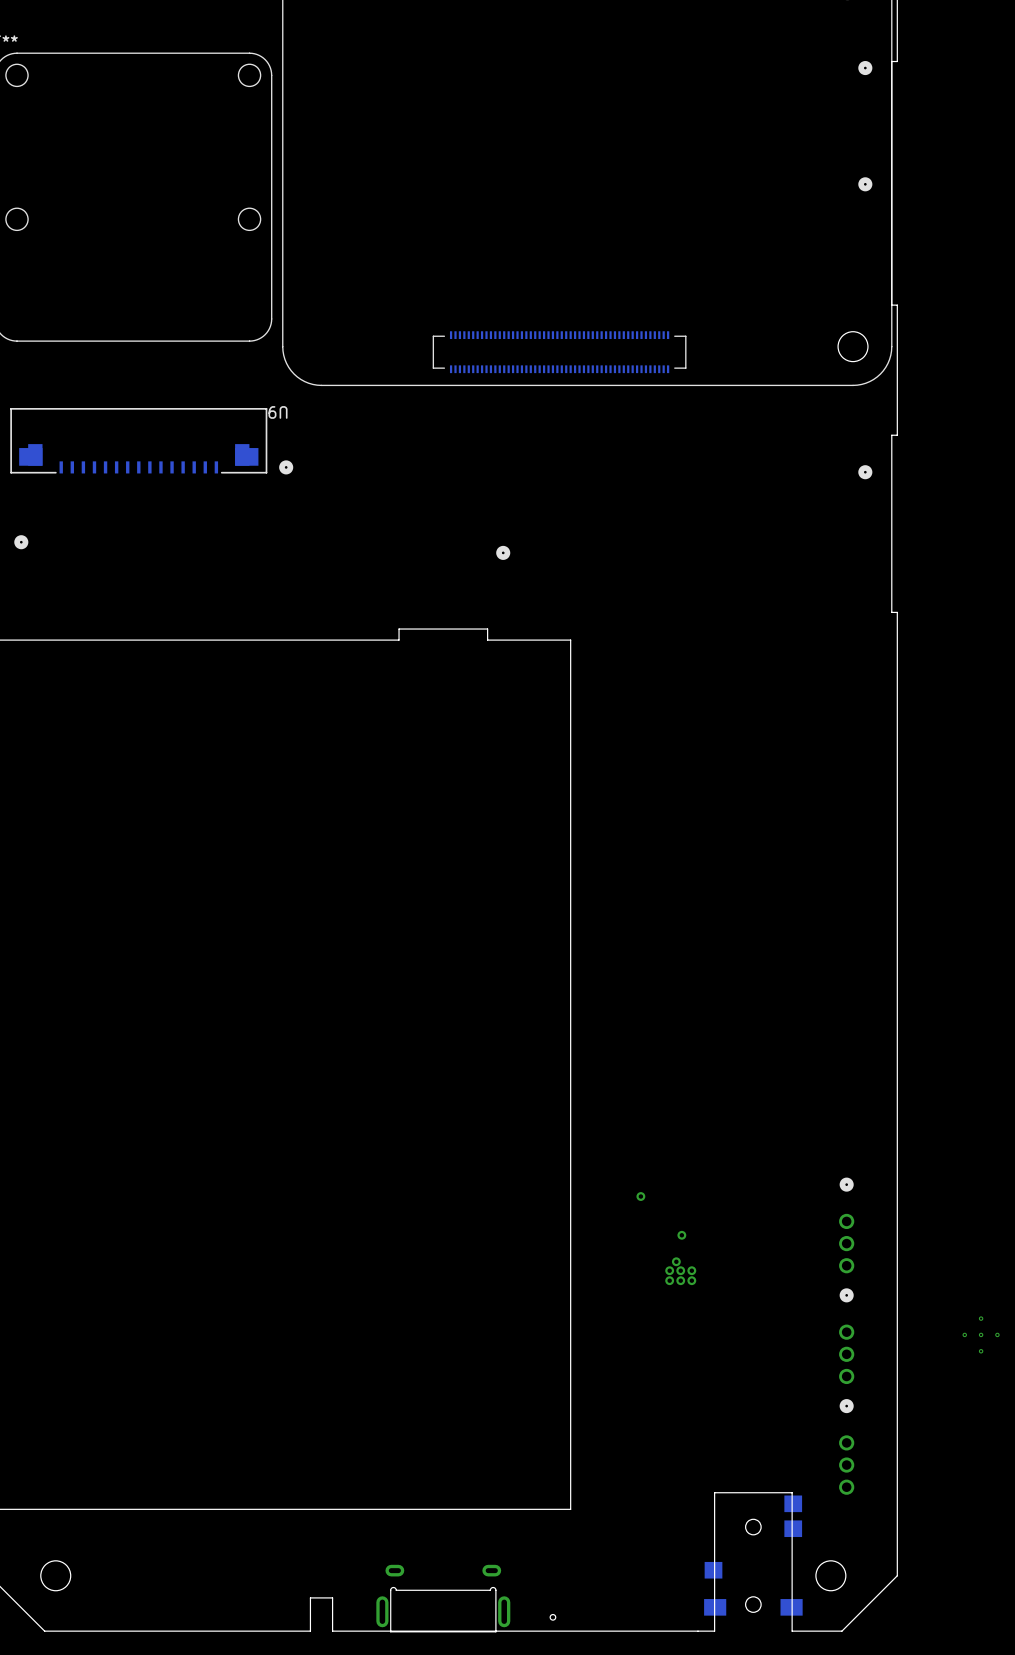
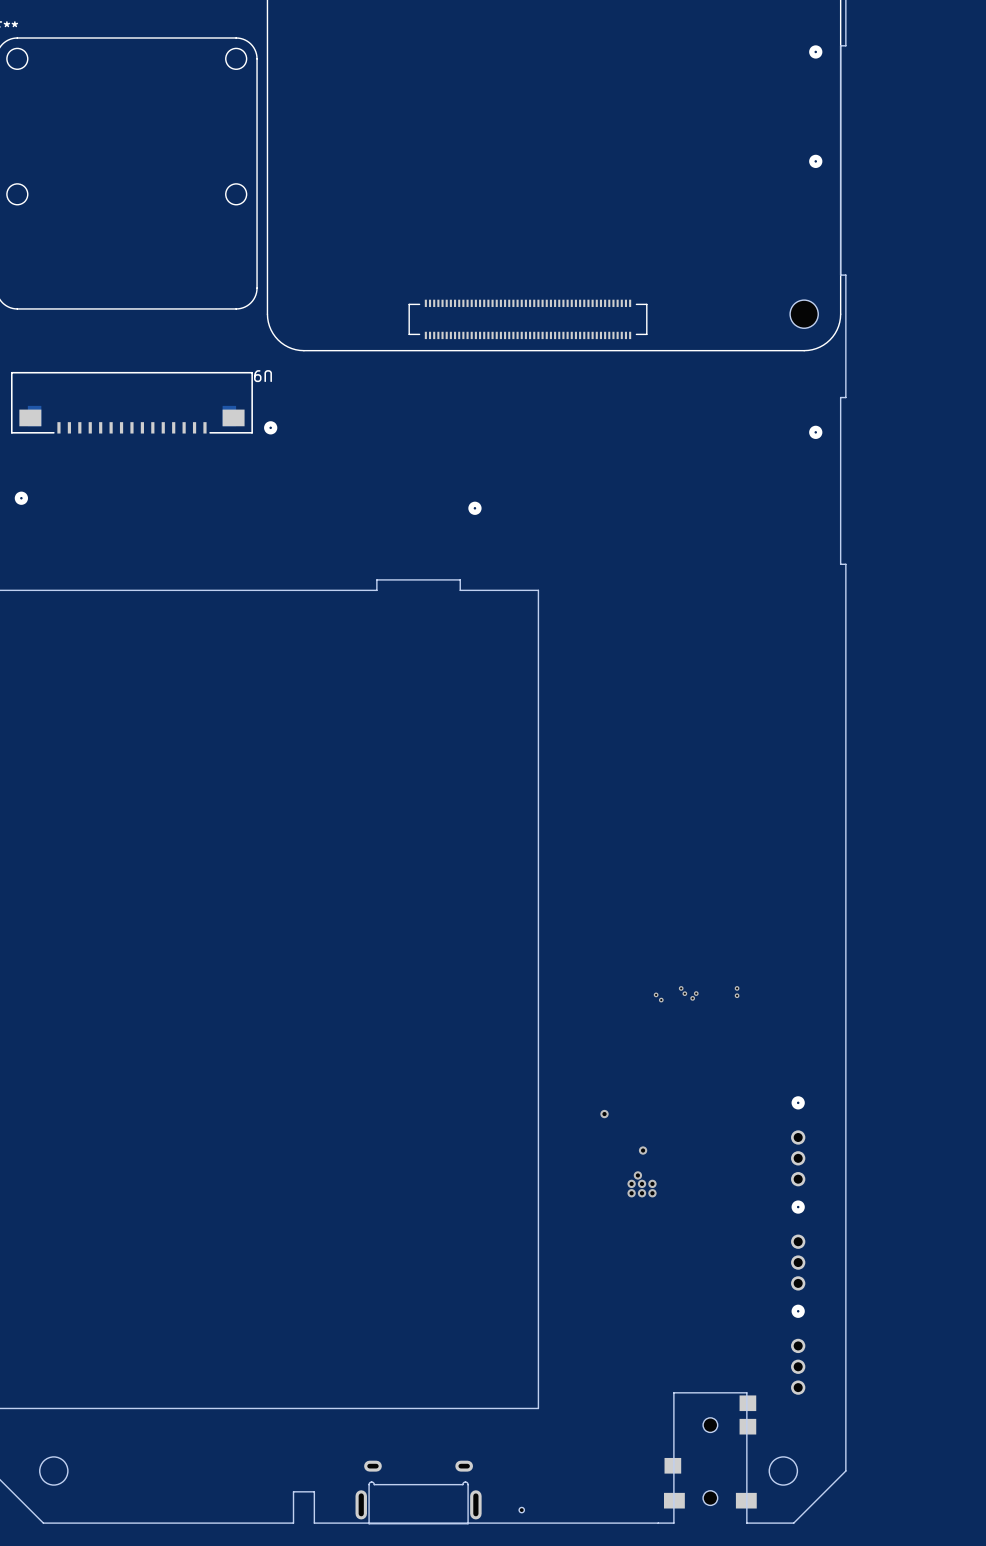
via: none -> (681, 988)
via: none -> (737, 988)
via: none -> (684, 993)
via: none -> (696, 993)
via: none -> (656, 994)
via: none -> (737, 995)
via: none -> (692, 998)
via: none -> (661, 1000)
part: (981, 1334) -> none

